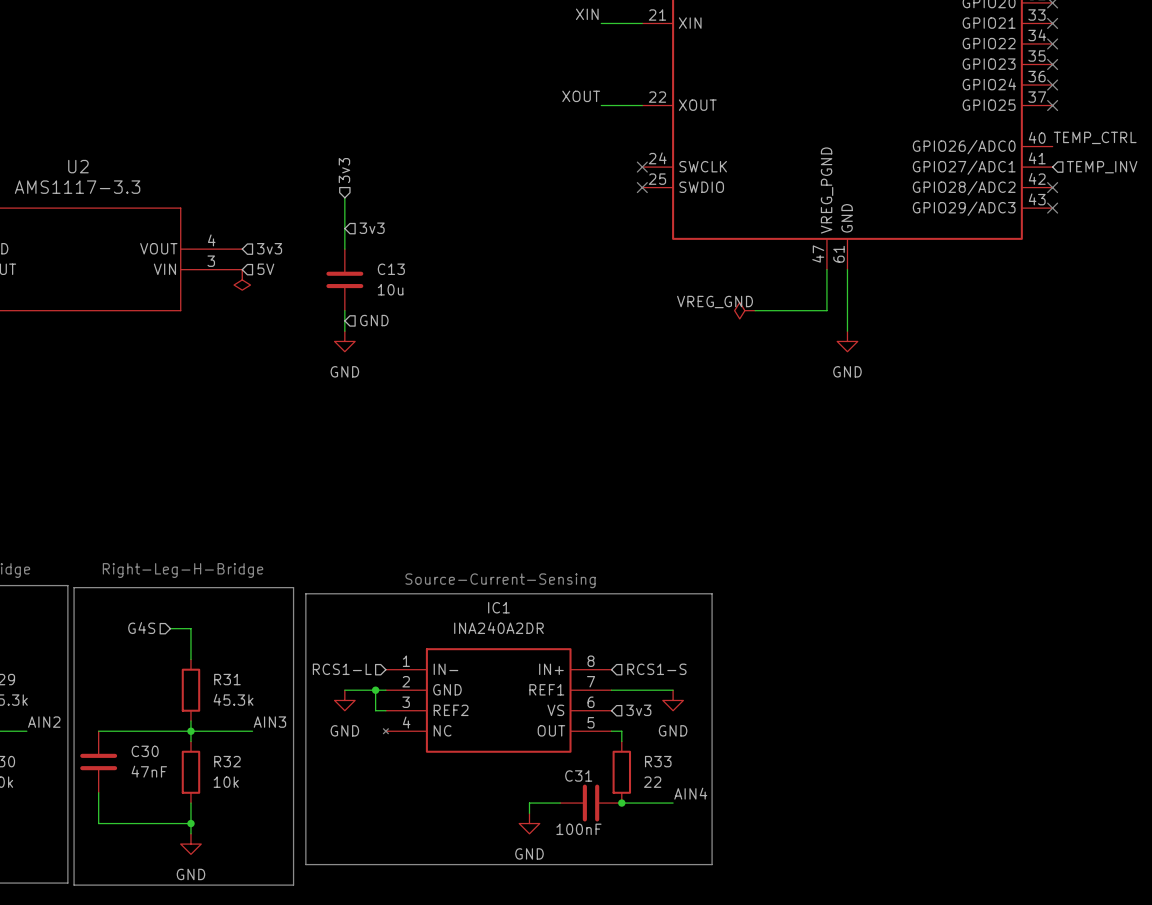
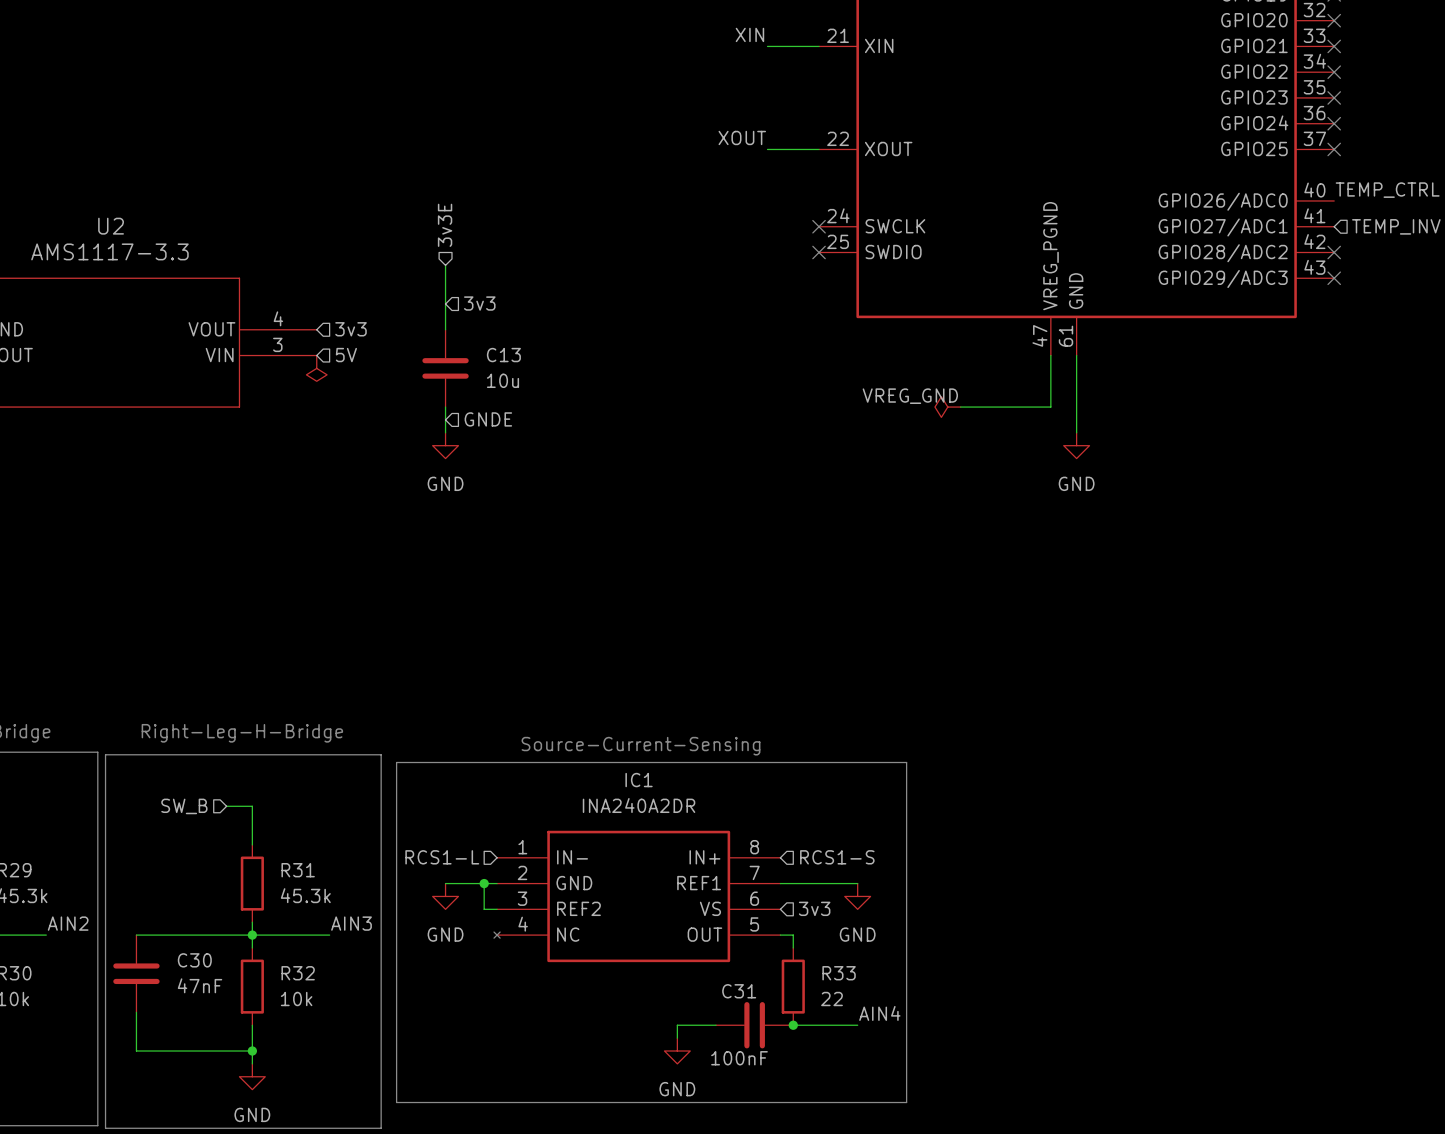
hierarchical label: 3v3 (344, 170) -> 3v3E (445, 225)
hierarchical label: GND (374, 320) -> GNDE (488, 419)
hierarchical label: G4S (141, 628) -> SW_B (184, 806)

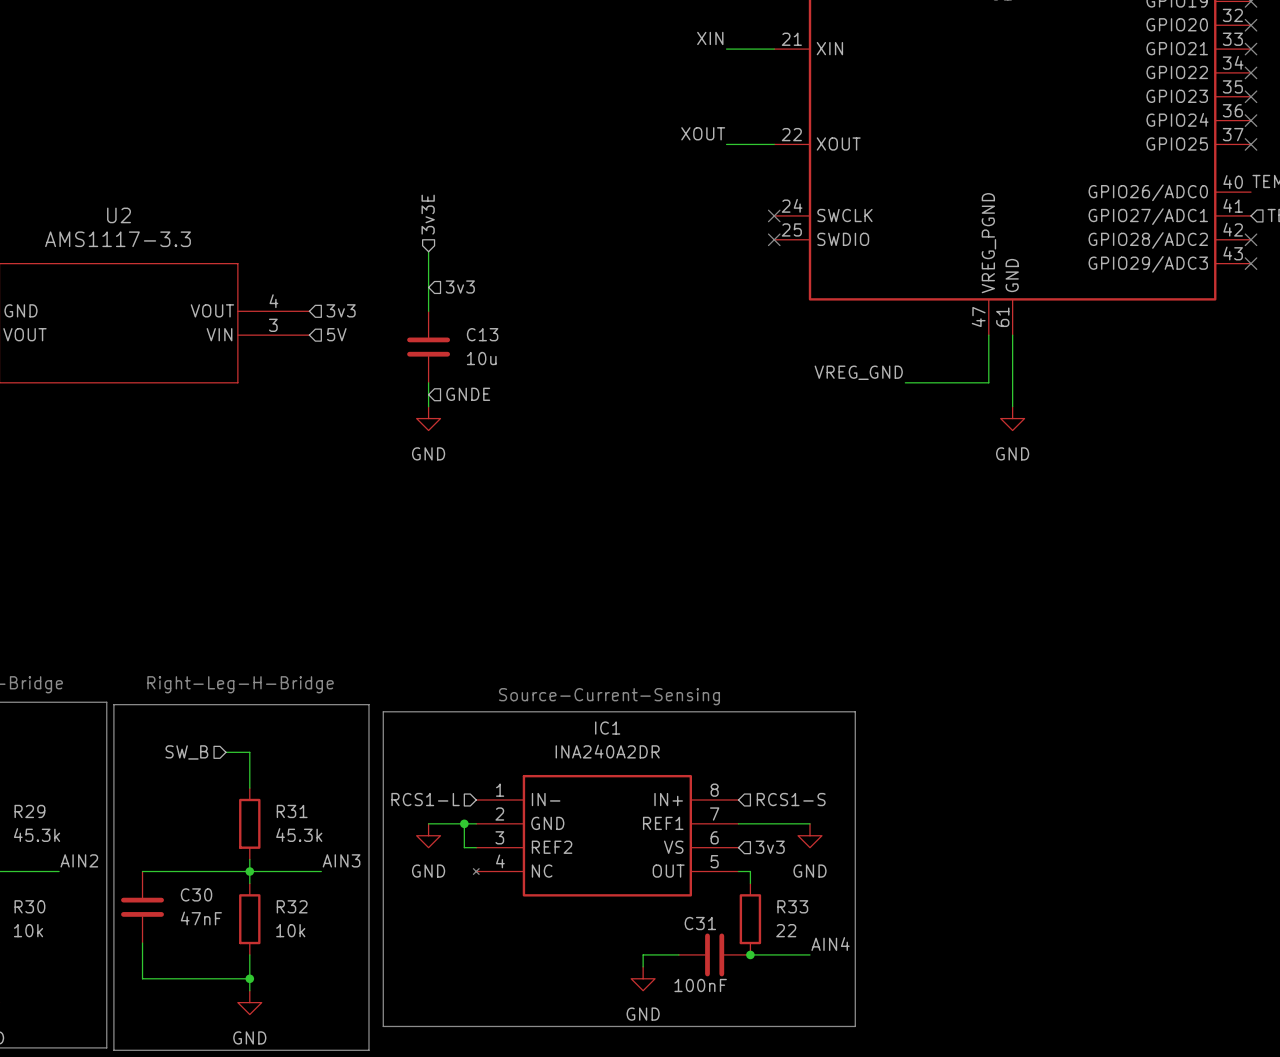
power symbol: (316, 368) -> none
power symbol: (947, 407) -> none

